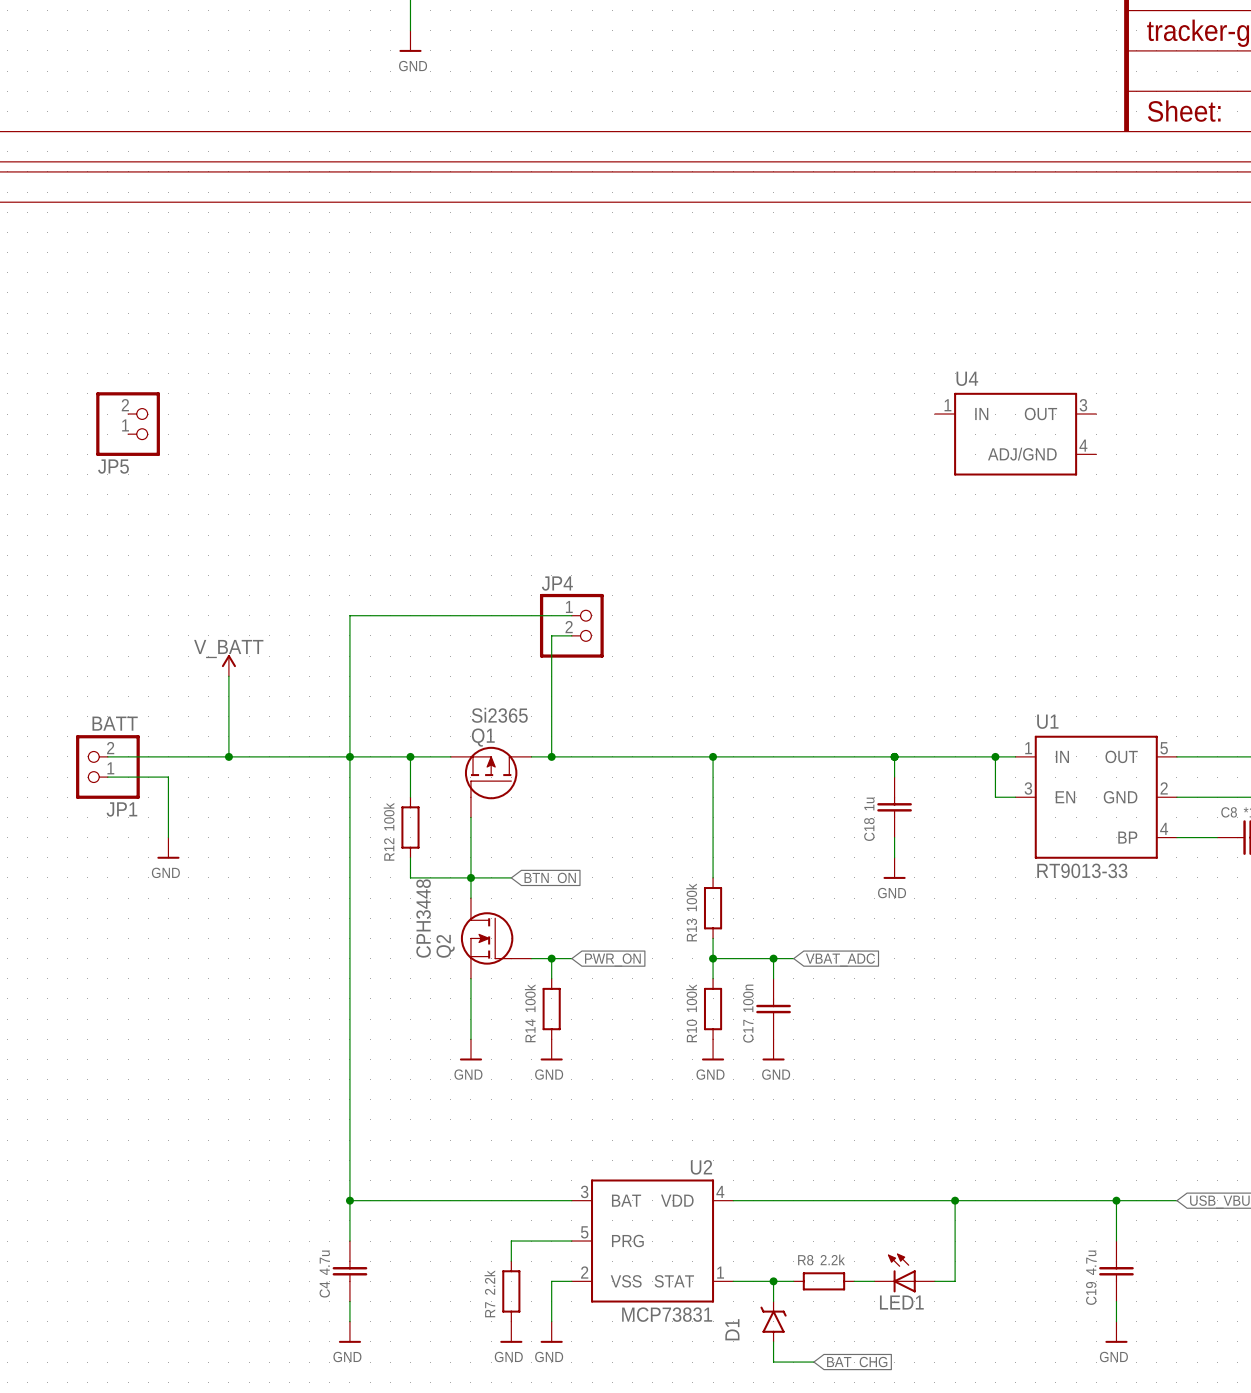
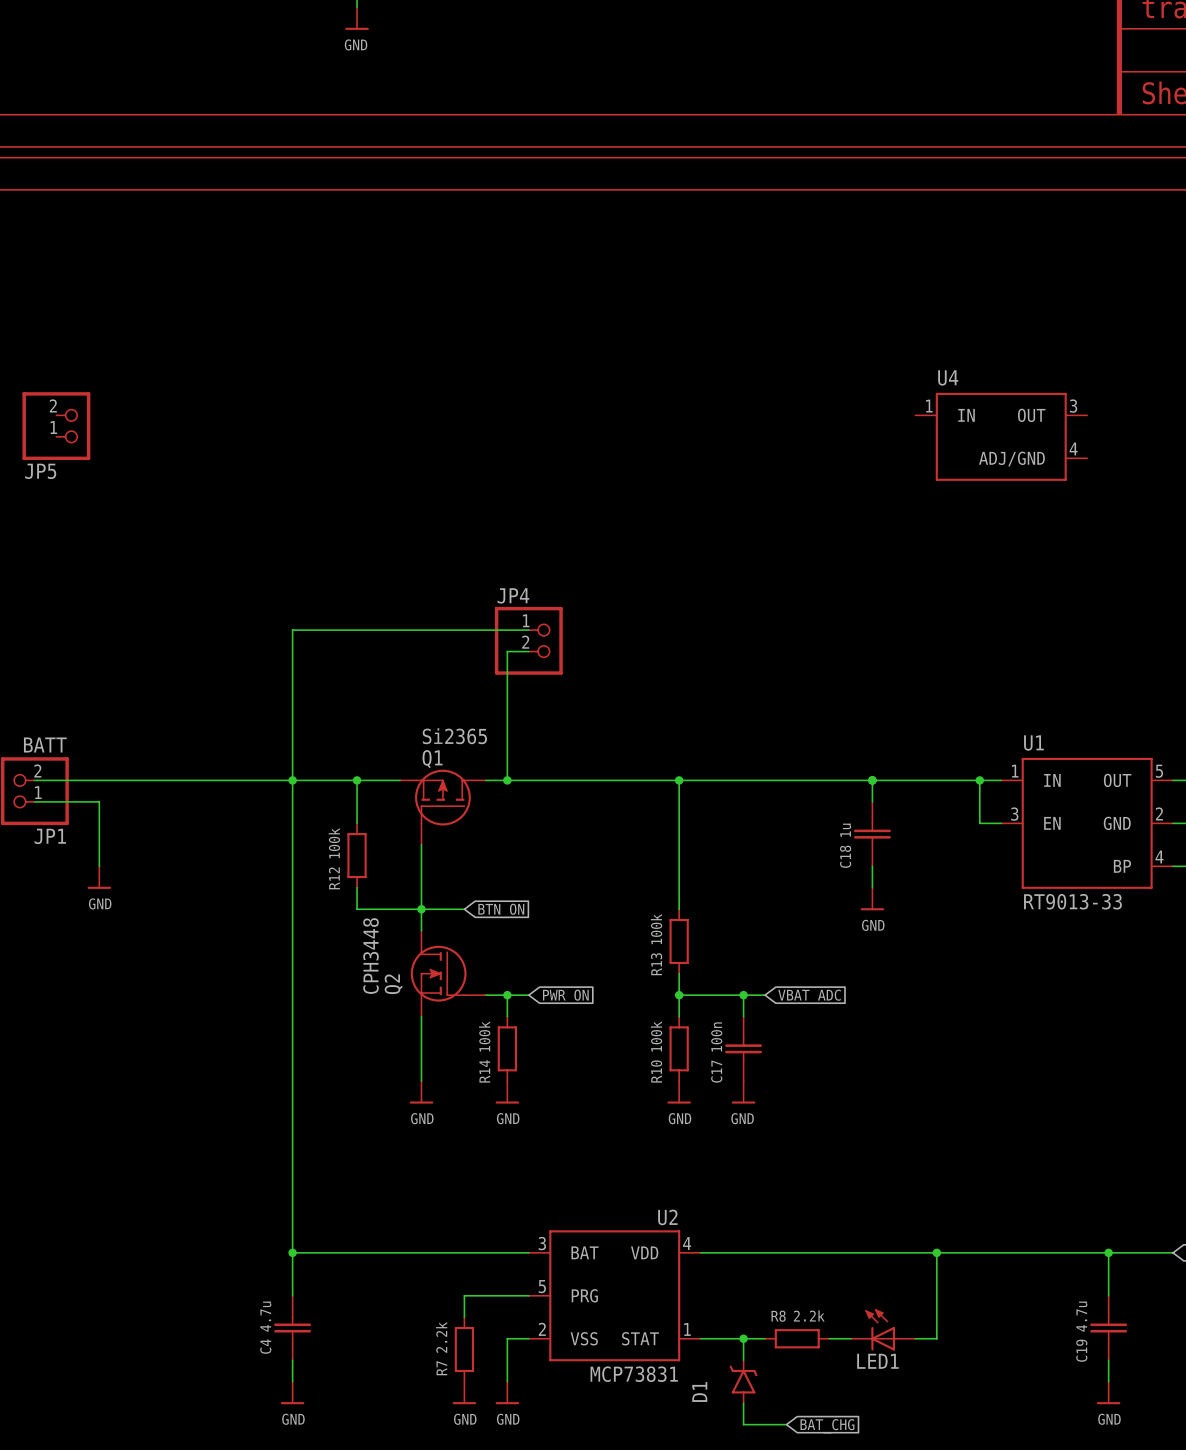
power symbol: V_BATT (228, 665) -> none
wire: (228, 676) (228, 756) -> none
junction: (228, 756) -> none

